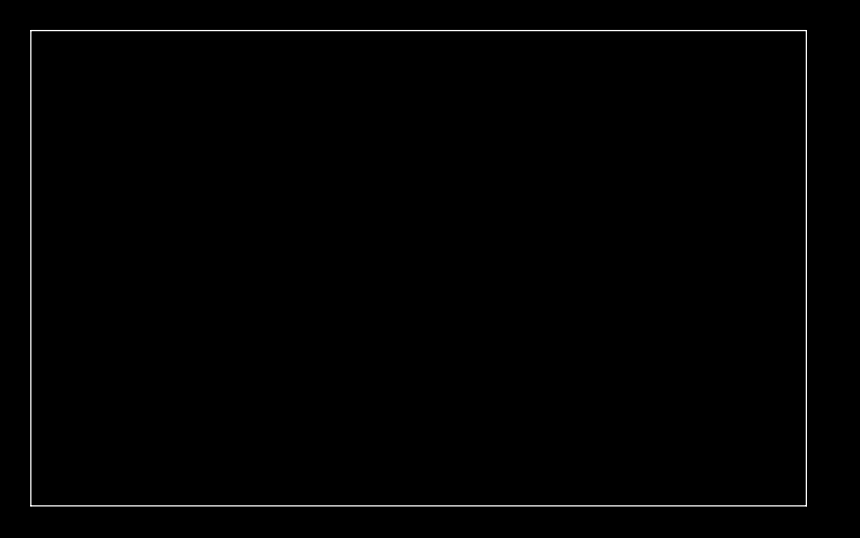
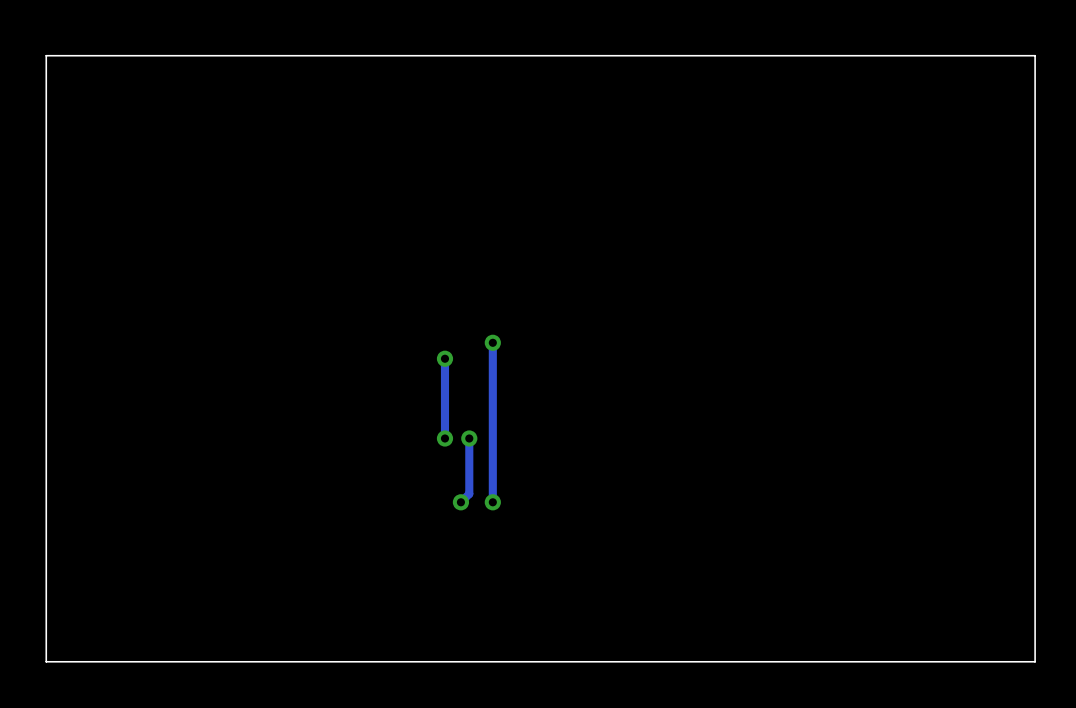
track: none -> (492, 342) (492, 502)
via: none -> (492, 342)
track: none -> (444, 358) (444, 438)
via: none -> (444, 358)
via: none -> (444, 438)
track: none -> (469, 438) (469, 493) (460, 502)
via: none -> (469, 438)
via: none -> (460, 502)
via: none -> (492, 502)

